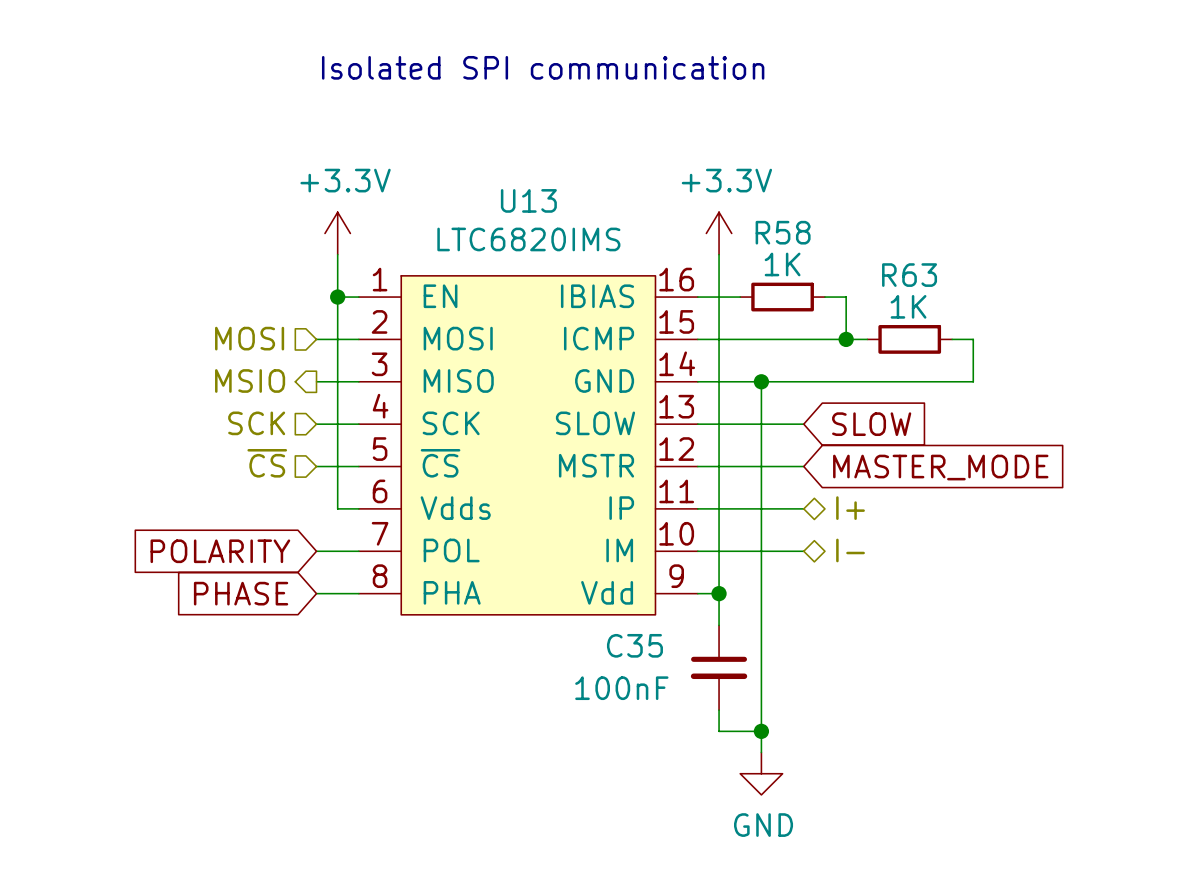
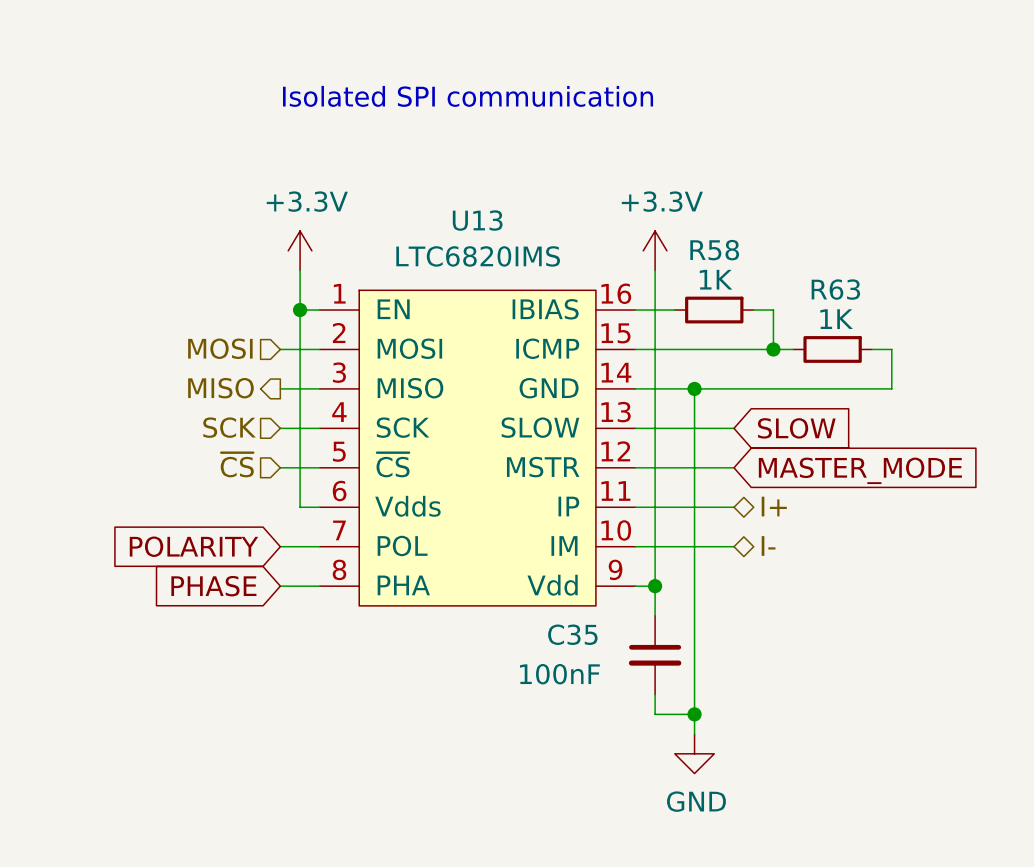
hierarchical label: MSIO (250, 380) -> MISO (220, 388)

